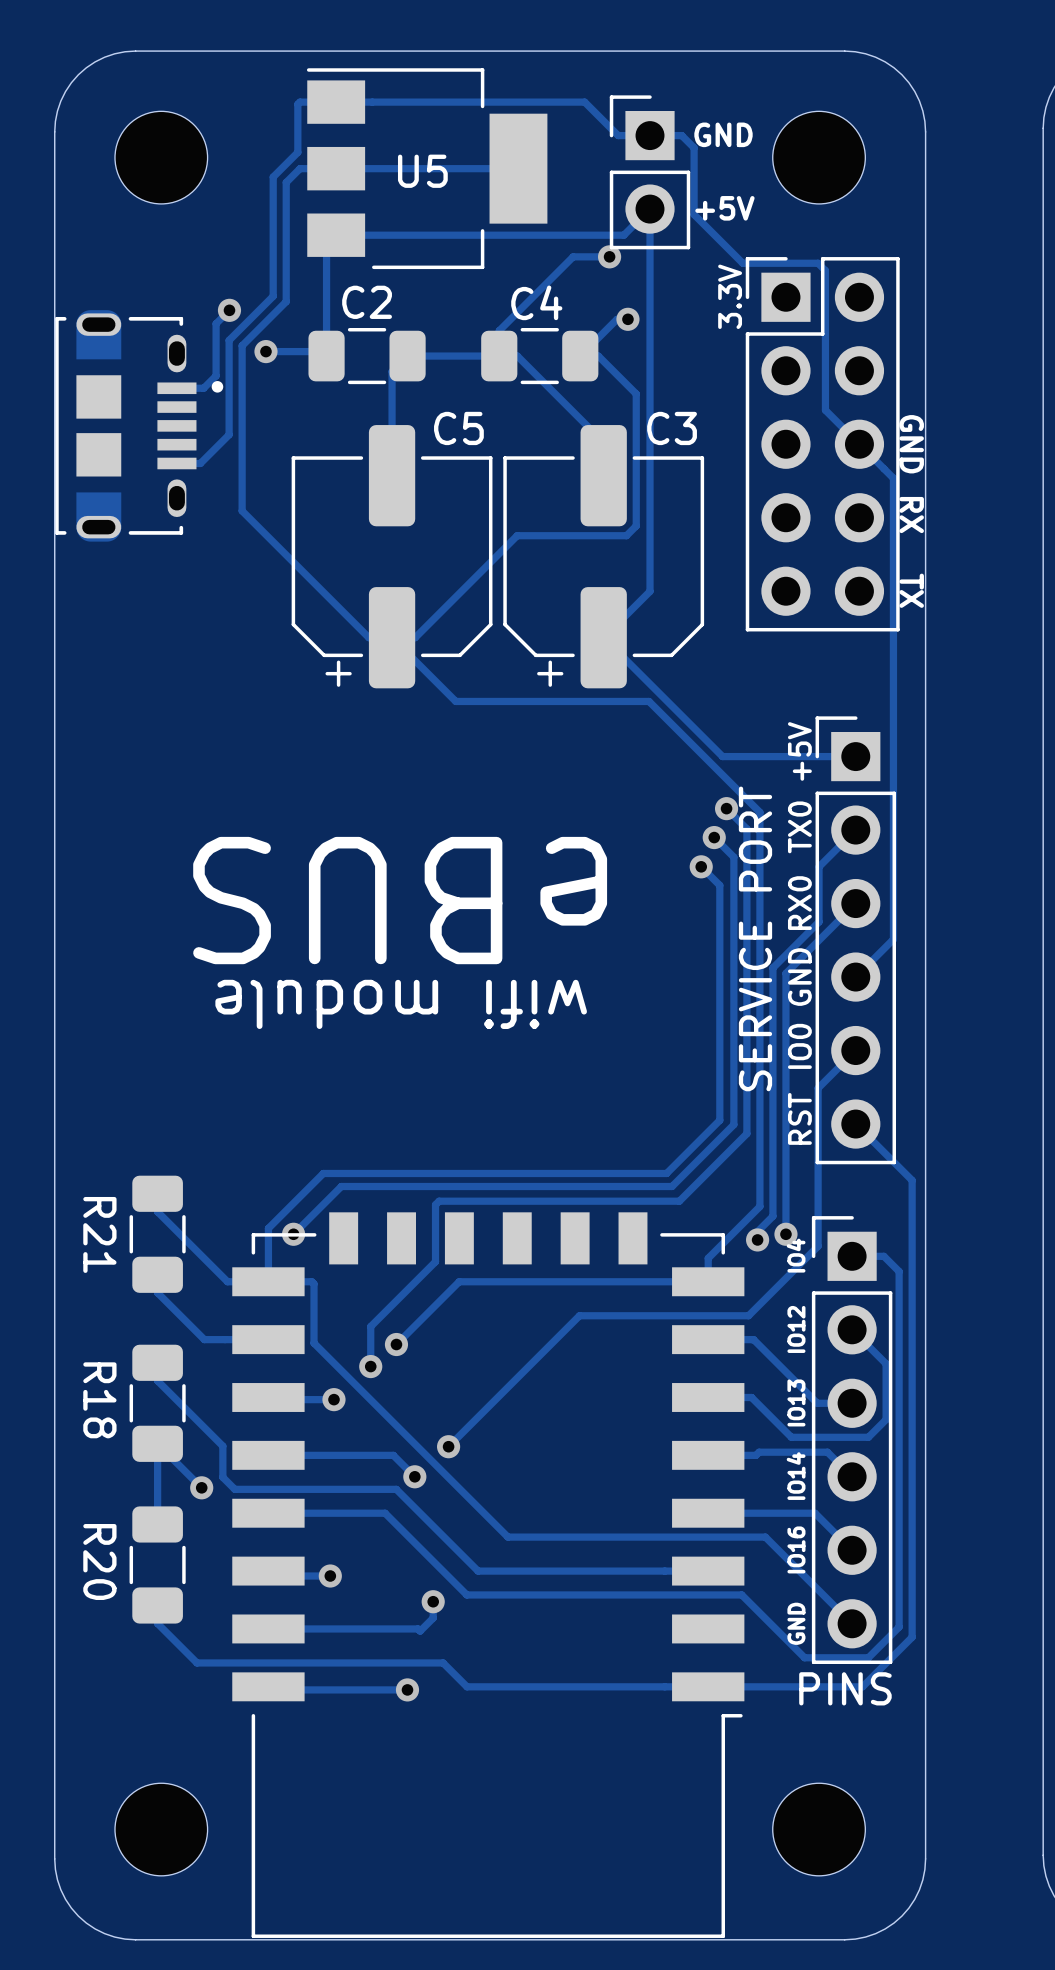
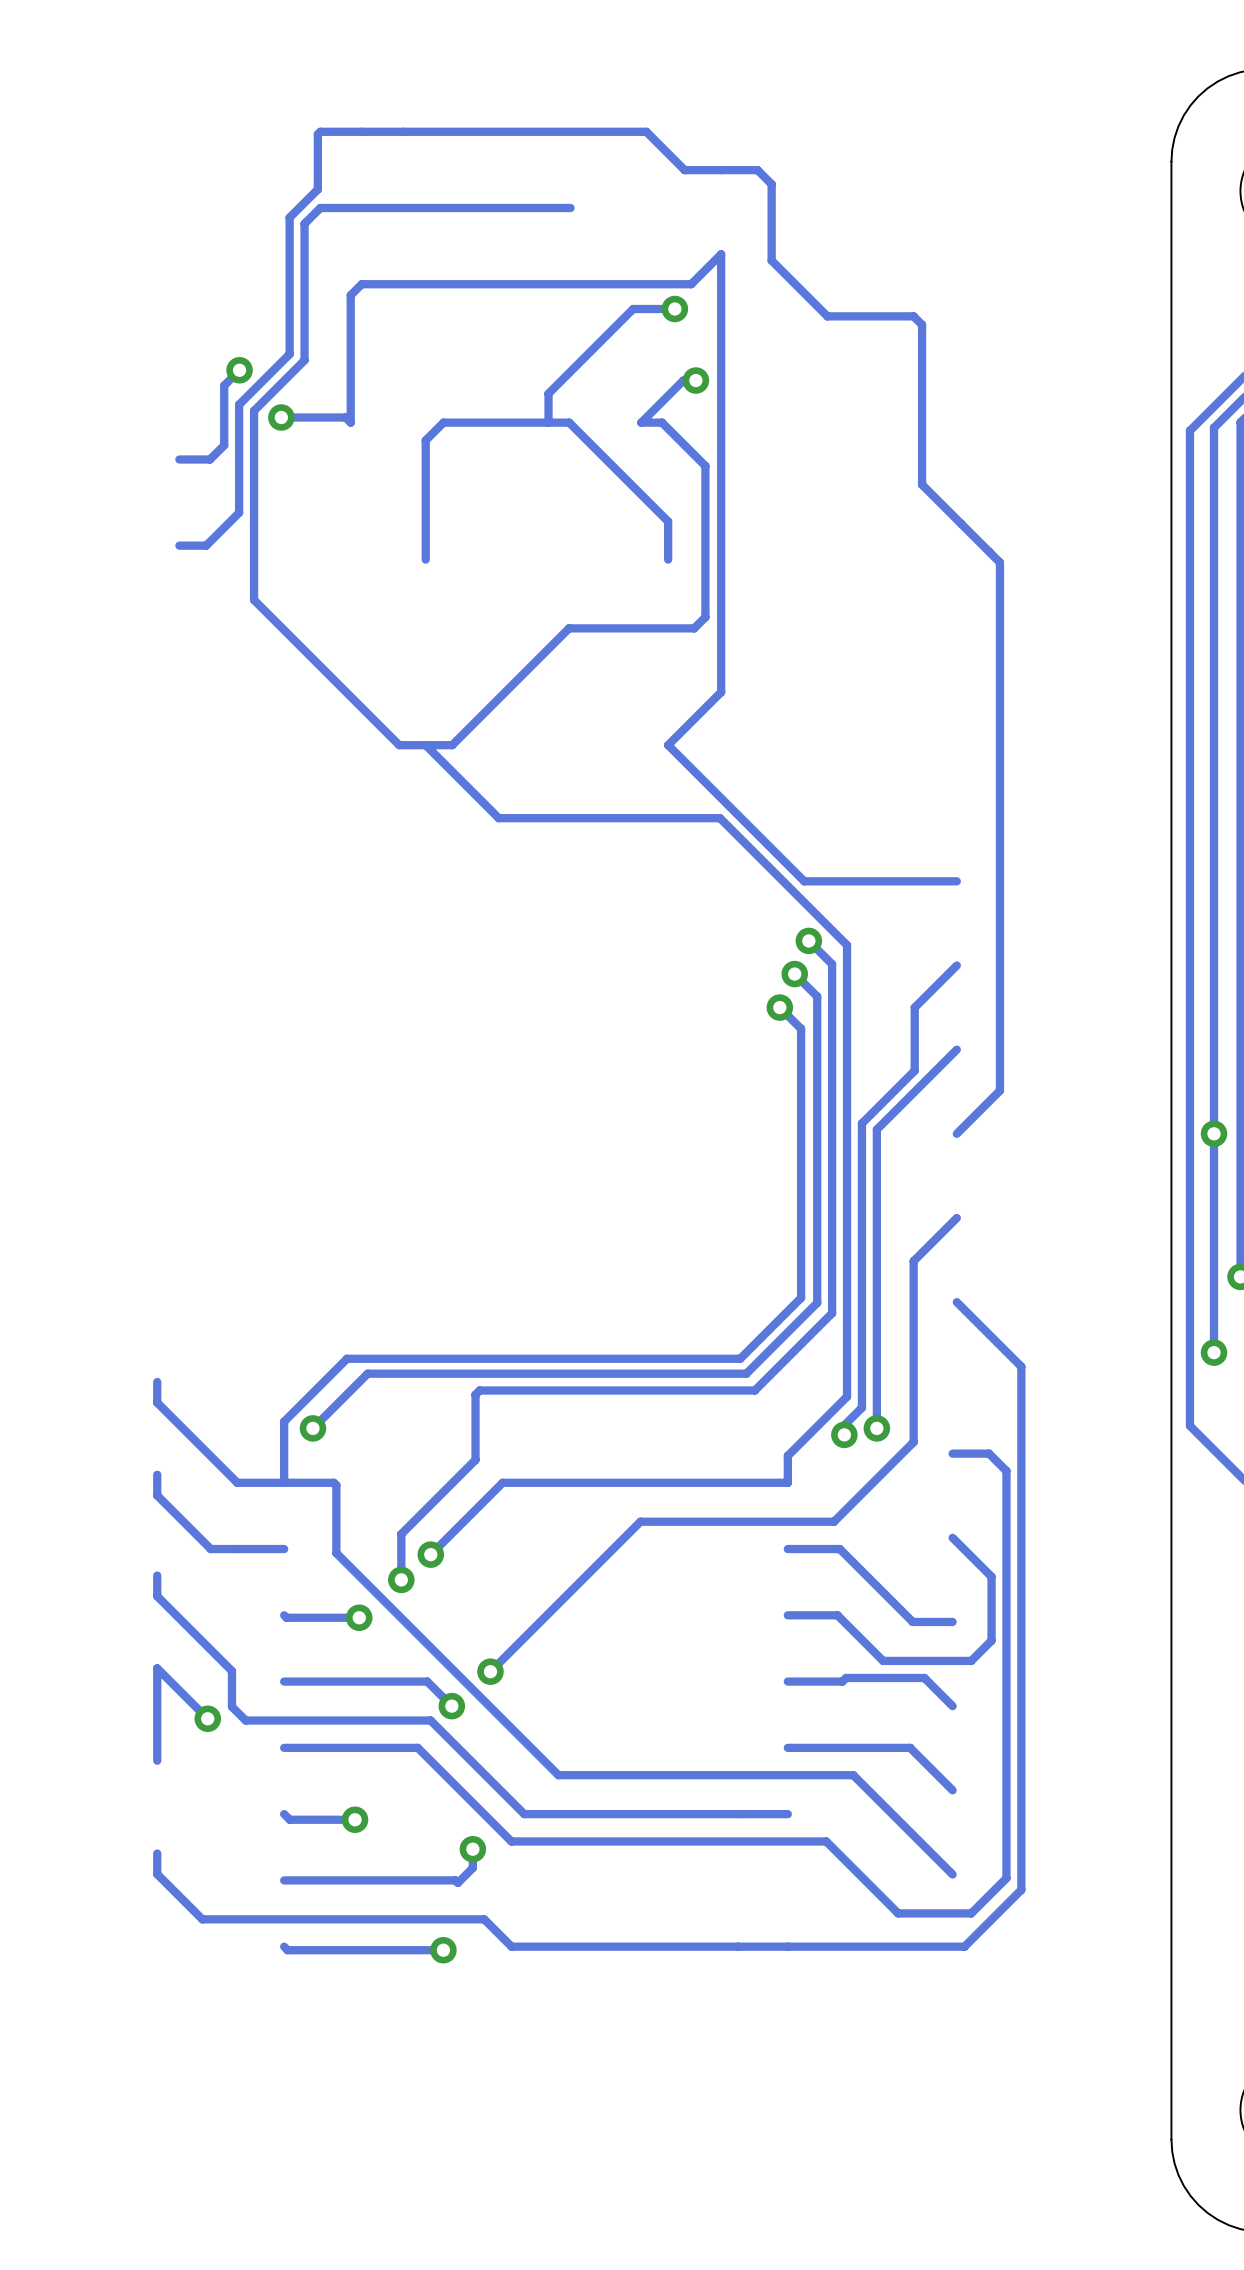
board edge: (844, 51) (135, 51) (104, 57) (86, 67) (71, 82) (60, 100) (54, 131) (54, 1858) (60, 1889) (71, 1908) (86, 1923) (104, 1933) (135, 1939) (844, 1939) (875, 1933) (893, 1923) (908, 1908) (919, 1889) (925, 1858) (925, 131) (919, 100) (901, 74) (875, 57) (844, 51) -> none
text: GND (723, 134) -> none
part: (161, 157) -> none
part: (819, 157) -> none
U5: (427, 168) -> none
part: (650, 172) -> none
text: +5V (724, 208) -> none
text: 3.3V (730, 296) -> none
C2: (367, 356) -> none
C4: (539, 356) -> none
part: (139, 425) -> none
part: (822, 444) -> none
text: GND (911, 444) -> none
text: RX (911, 515) -> none
C5: (392, 556) -> none
C3: (603, 556) -> none
text: TX (911, 590) -> none
text: +5V (799, 751) -> none
text: TX0 (799, 827) -> none
text: eBUS (400, 900) -> none
text: RX0 (799, 903) -> none
text: SERVICE PORT (755, 938) -> none
part: (855, 940) -> none
text: GND (799, 977) -> none
text: wifi module (401, 1004) -> none
text: IO0 (799, 1046) -> none
text: RST (799, 1118) -> none
R21: (157, 1234) -> none
text: IO4 (796, 1255) -> none
text: IO12 (796, 1329) -> none
text: IO13 (796, 1402) -> none
R18: (157, 1403) -> none
part: (852, 1440) -> none
text: IO14 (796, 1476) -> none
text: IO16 (796, 1549) -> none
R20: (157, 1564) -> none
part: (488, 1575) -> none
text: GND (796, 1623) -> none
text: PINS (845, 1688) -> none
part: (161, 1829) -> none
part: (819, 1829) -> none

